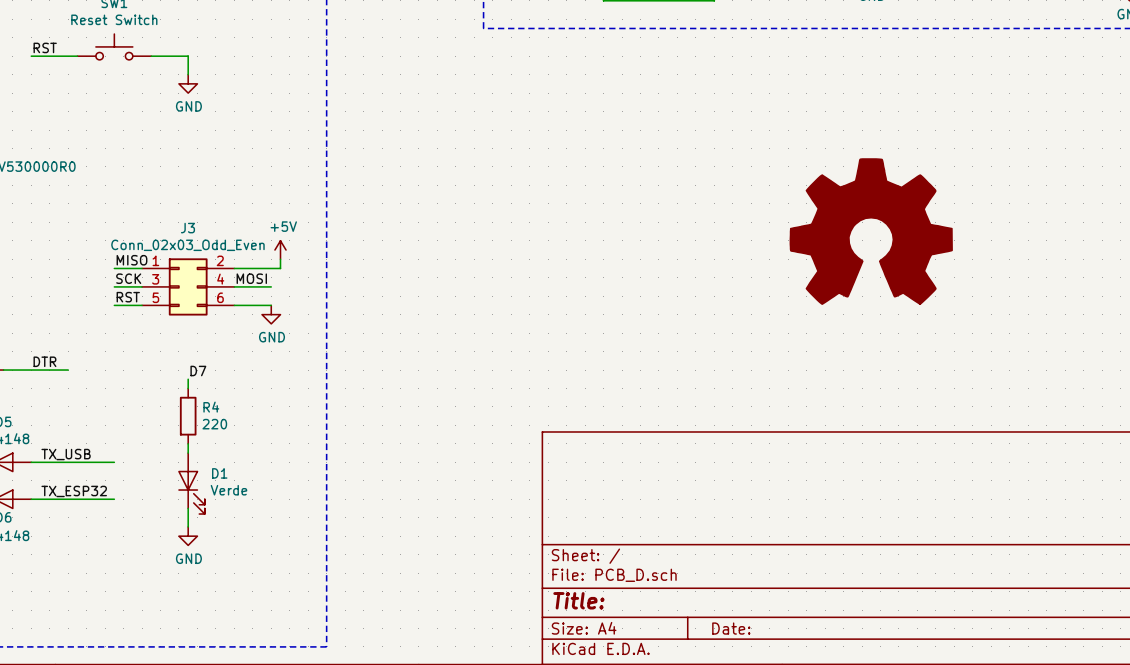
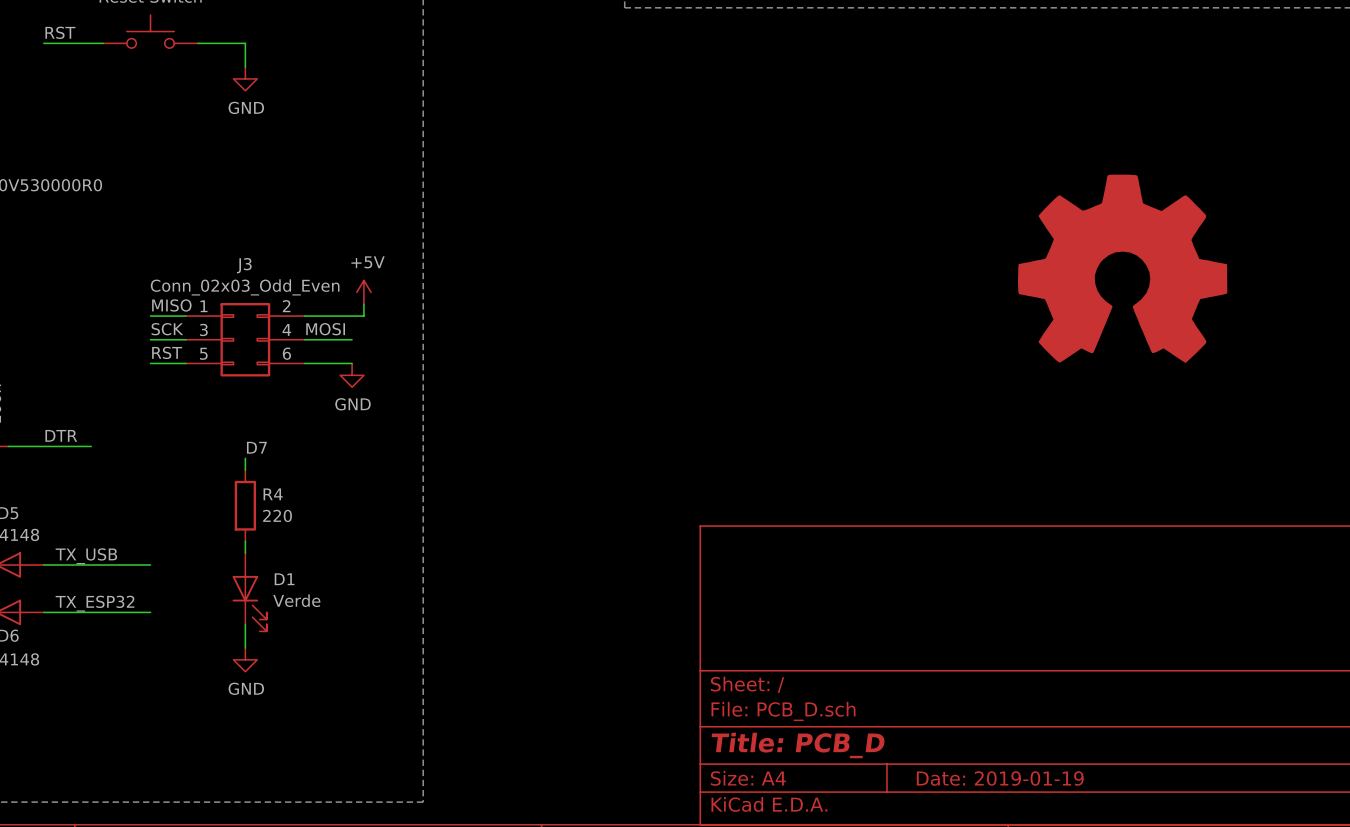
title block: Title: (578, 600) -> Title: PCB_D (798, 745)
title block: Date: (731, 628) -> Date: 2019-01-19 (1000, 778)

